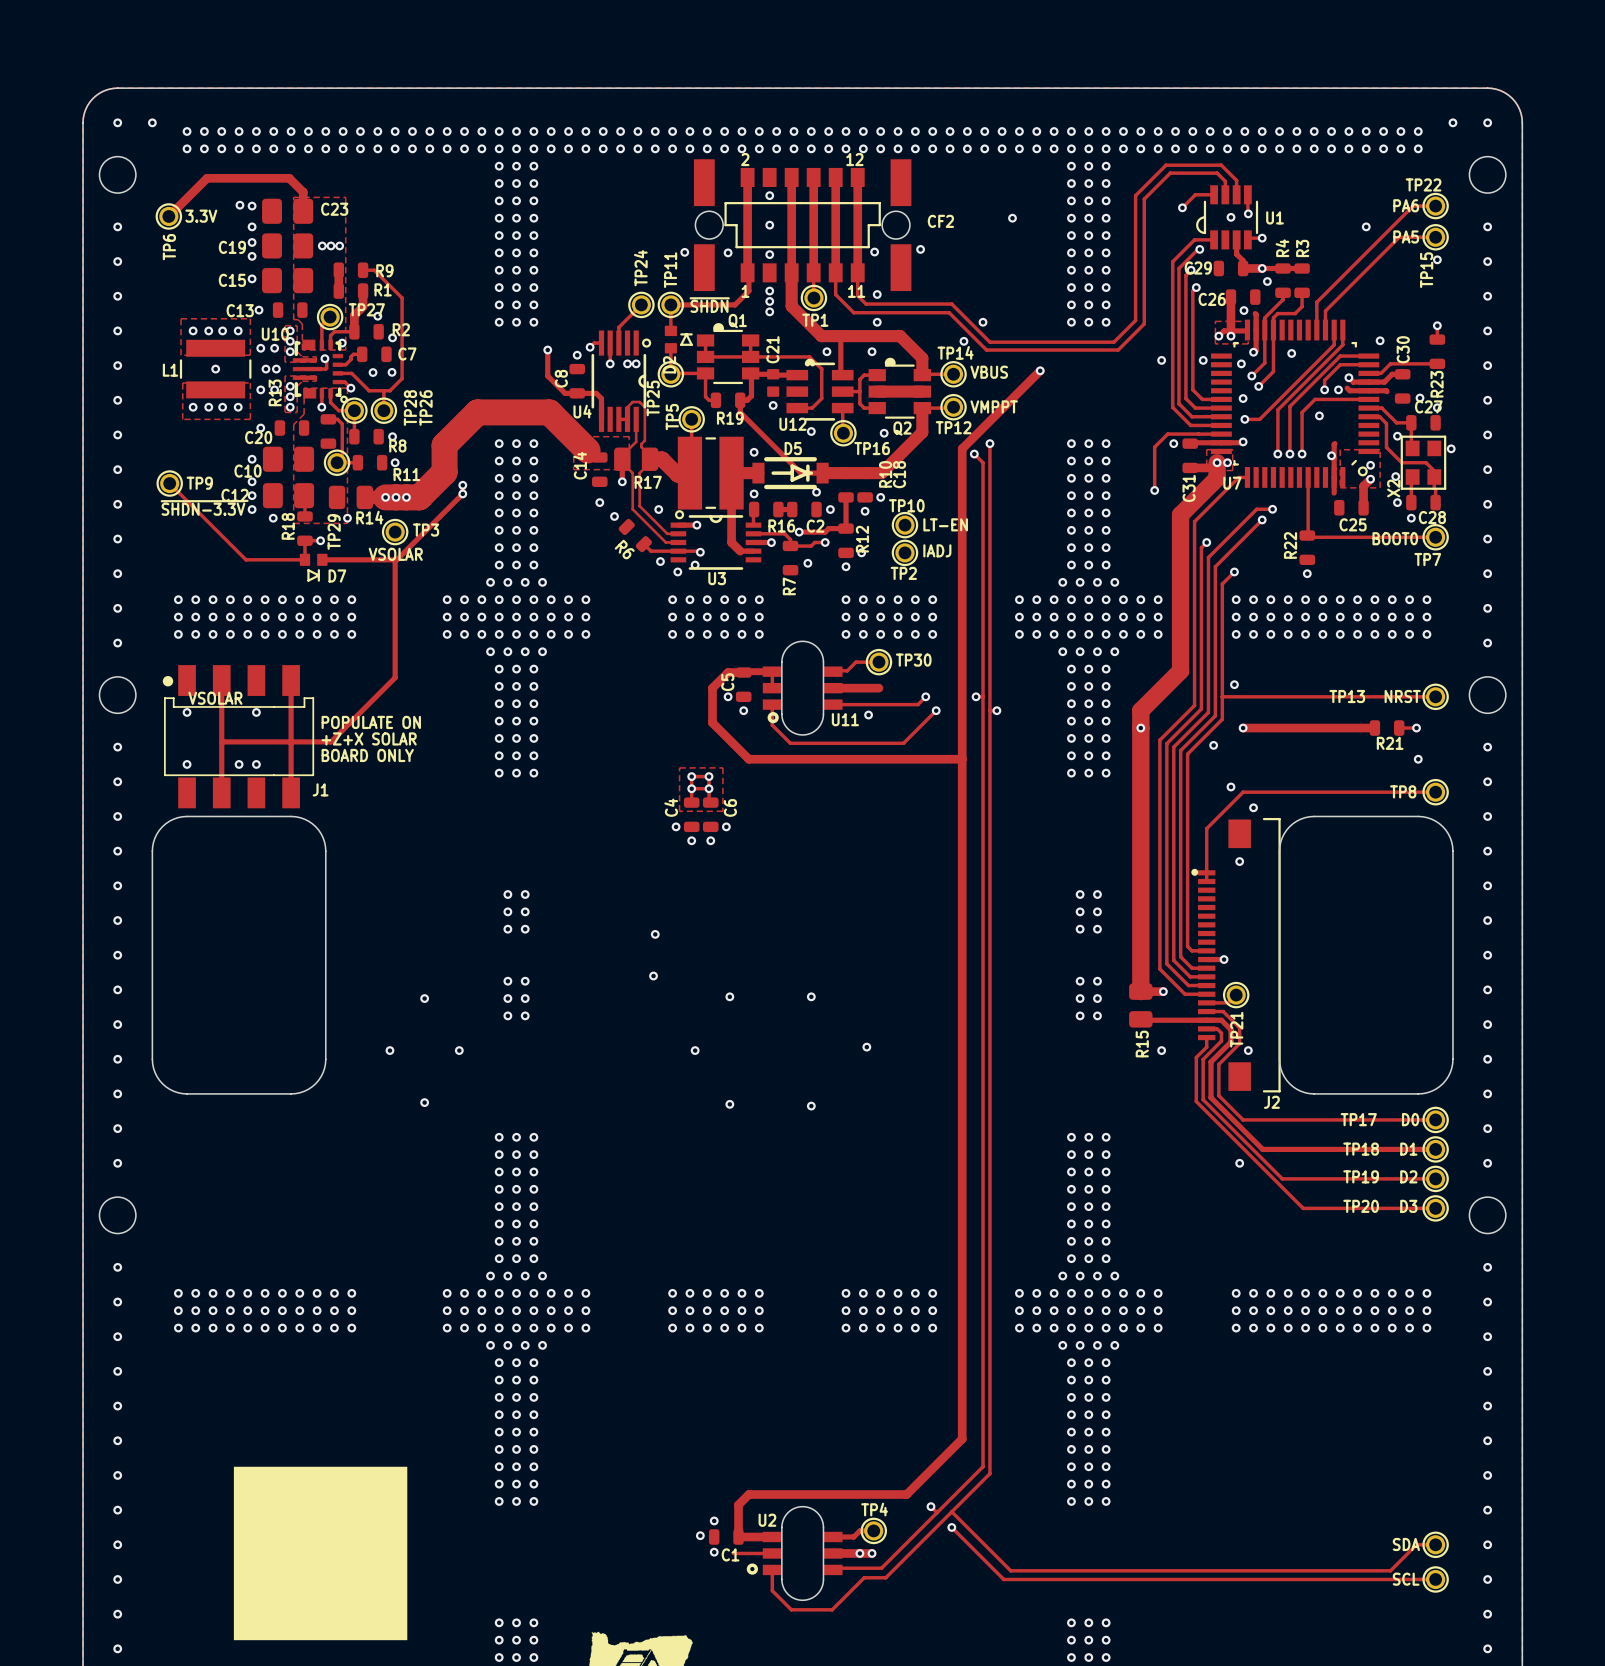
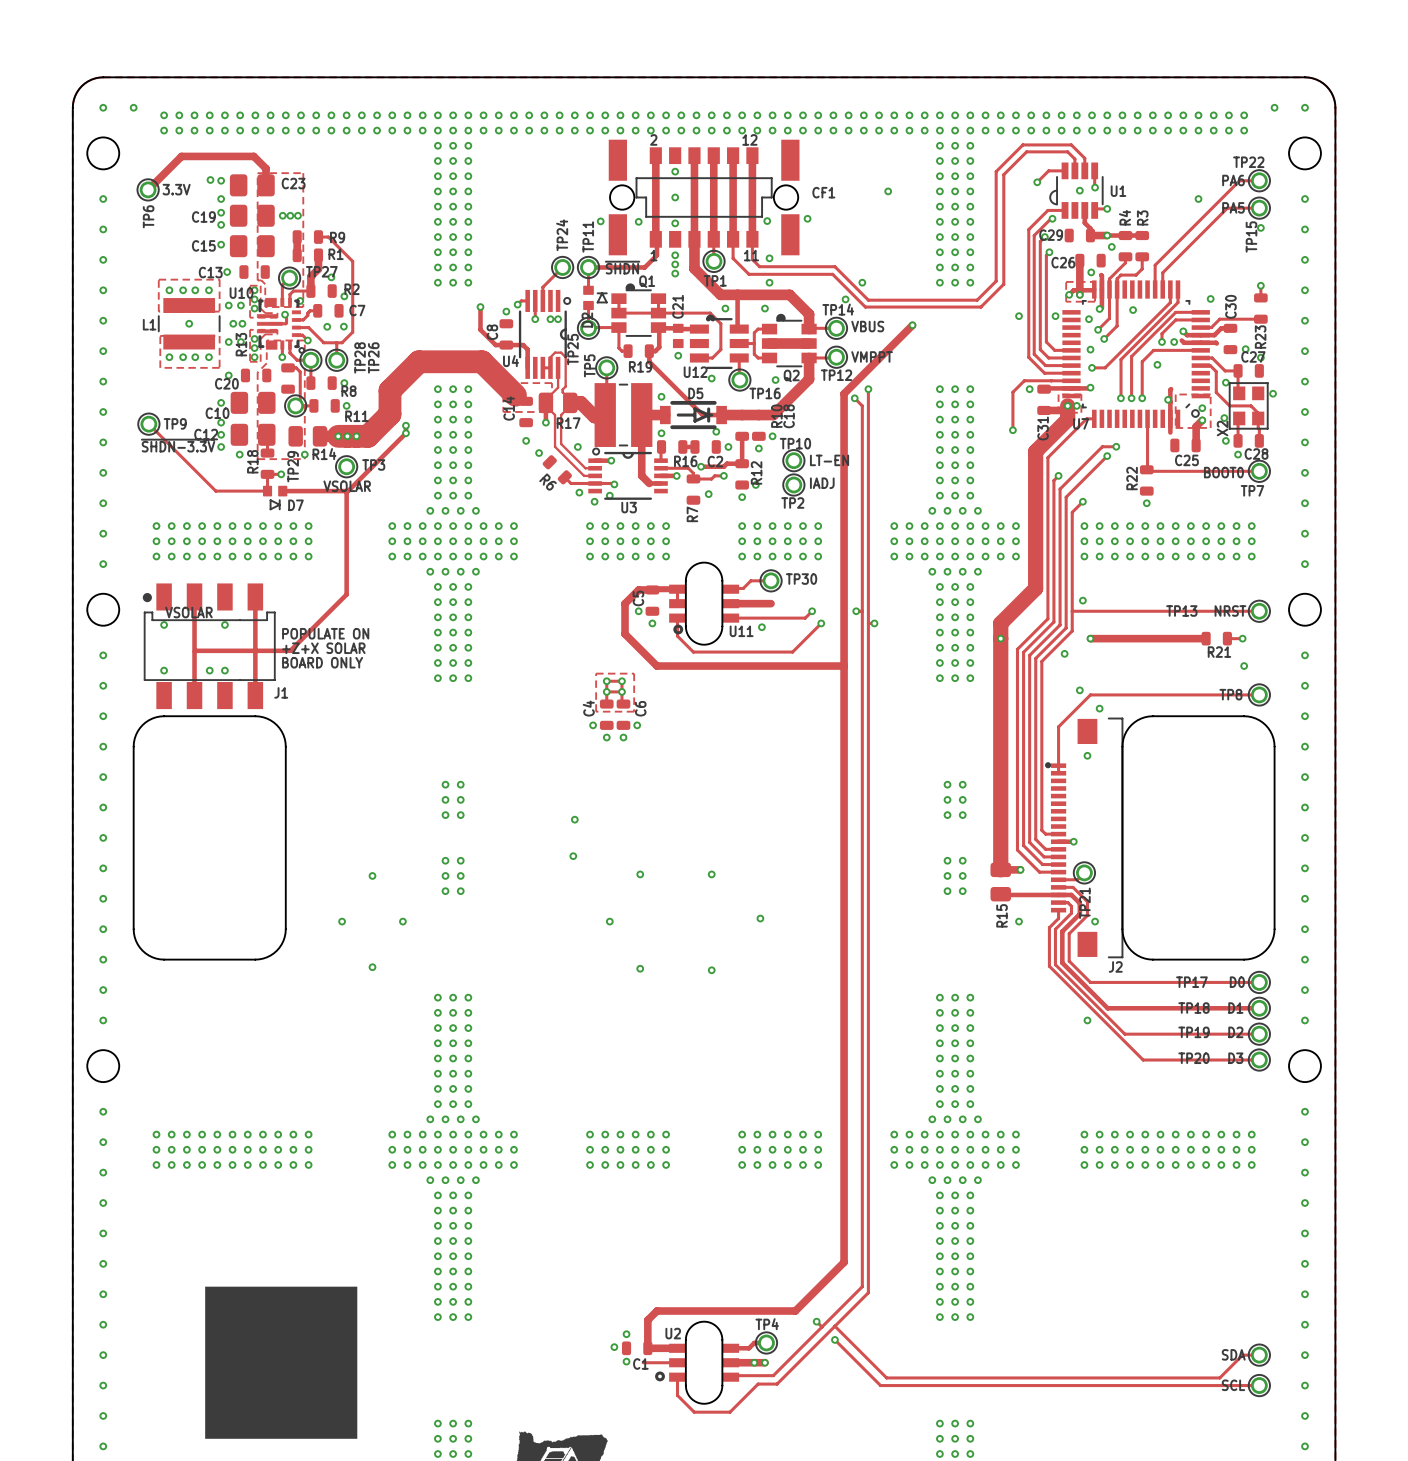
CF2 name: CF2 (940, 221) -> CF1 (823, 192)

